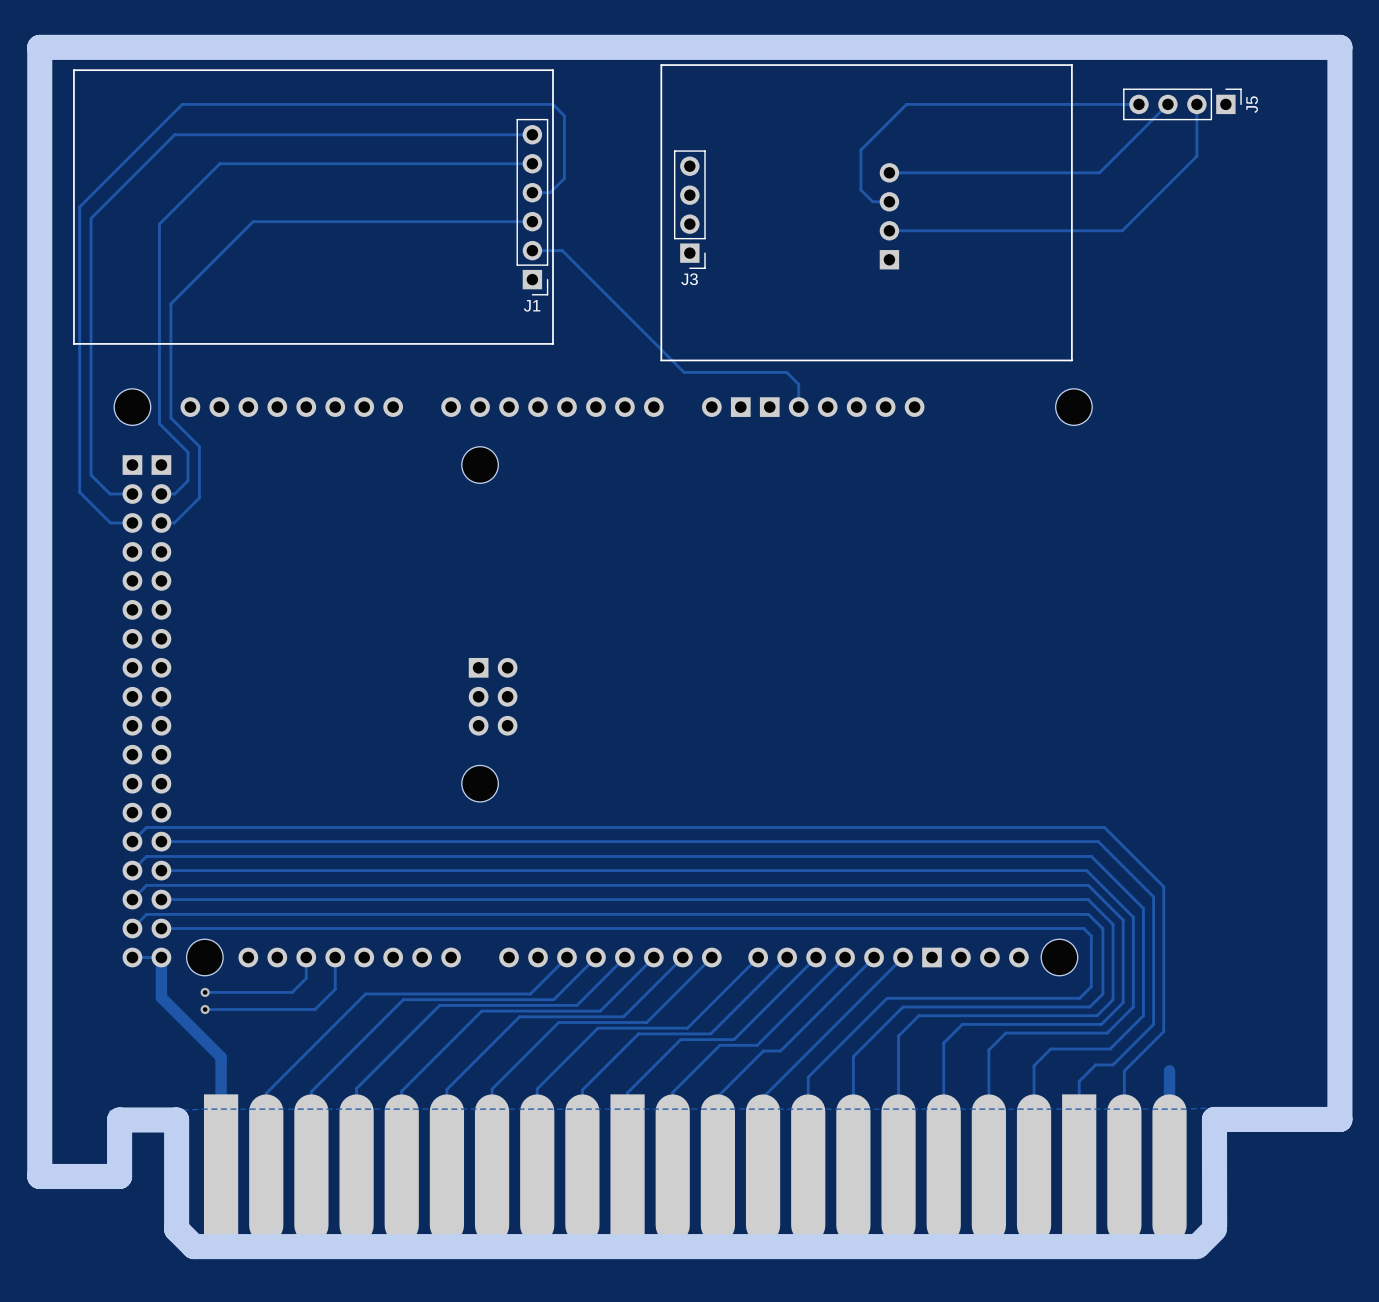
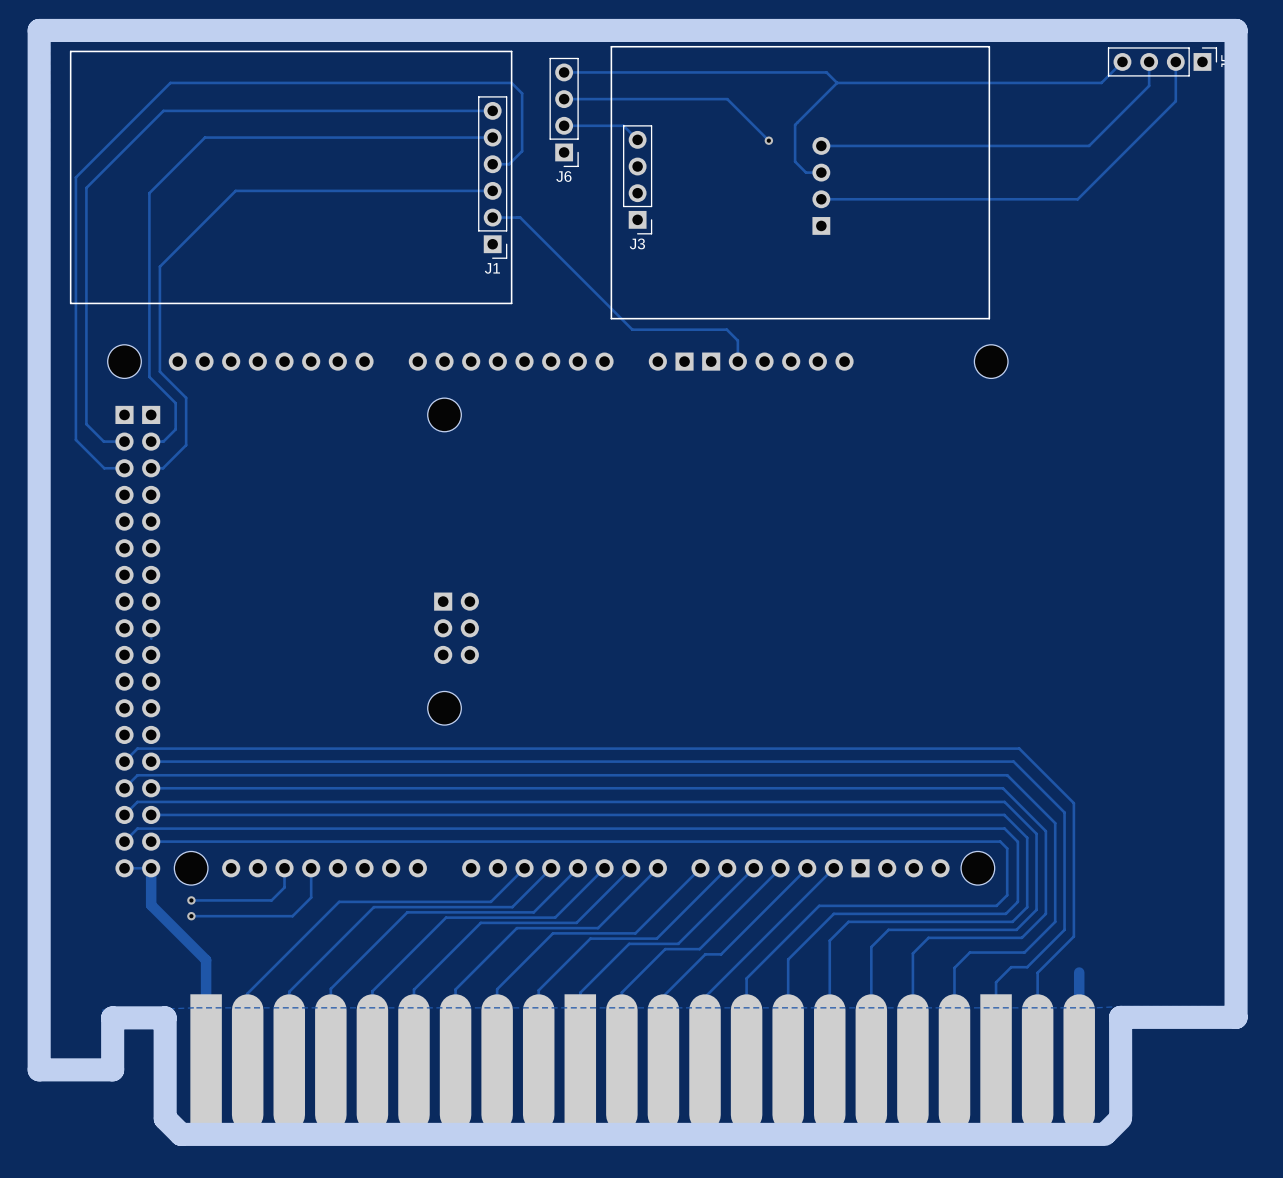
track: none -> (1122, 61) (1101, 82) (1051, 82)
track: none -> (1175, 61) (1175, 101) (1077, 199) (1035, 199)
track: none -> (564, 72) (826, 72) (837, 82)
track: (1167, 104) (1099, 172) -> none
J5 position: (1182, 104) -> (1162, 61)
track: (1196, 104) (1196, 156) -> (1149, 61) (1149, 85) (1104, 130)
track: none -> (564, 99) (727, 99) (768, 140)
J6: none -> (564, 112)
track: none -> (564, 125) (623, 125) (637, 139)
via: none -> (768, 140)
track: (1180, 172) (1122, 230) -> (1089, 145) (1014, 145)

